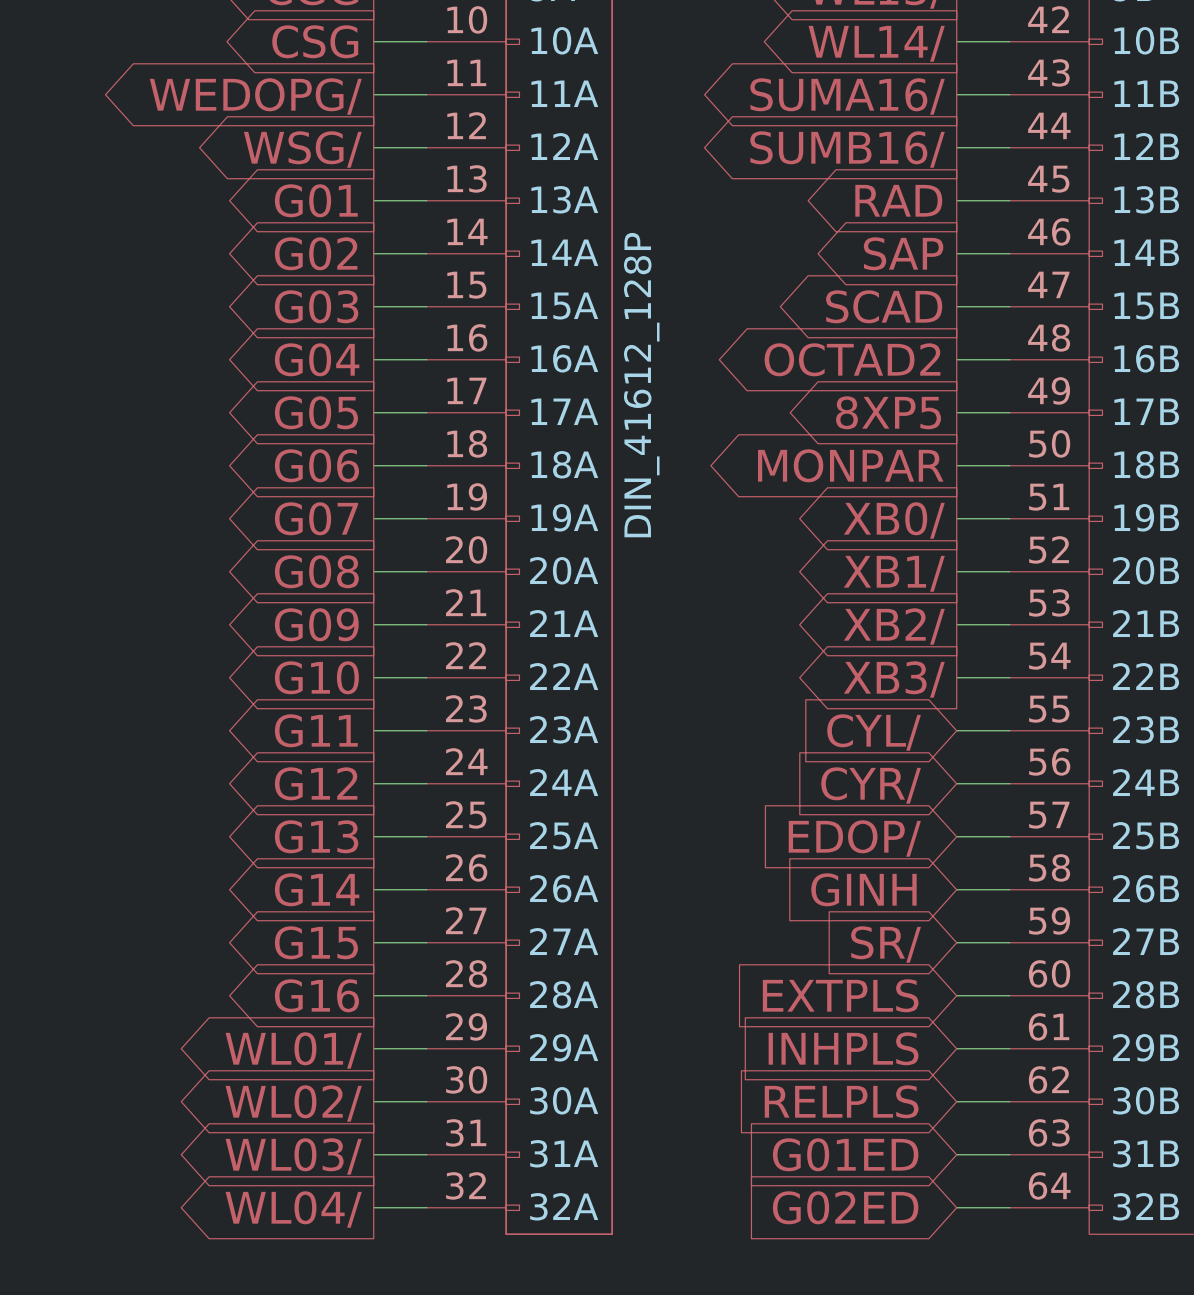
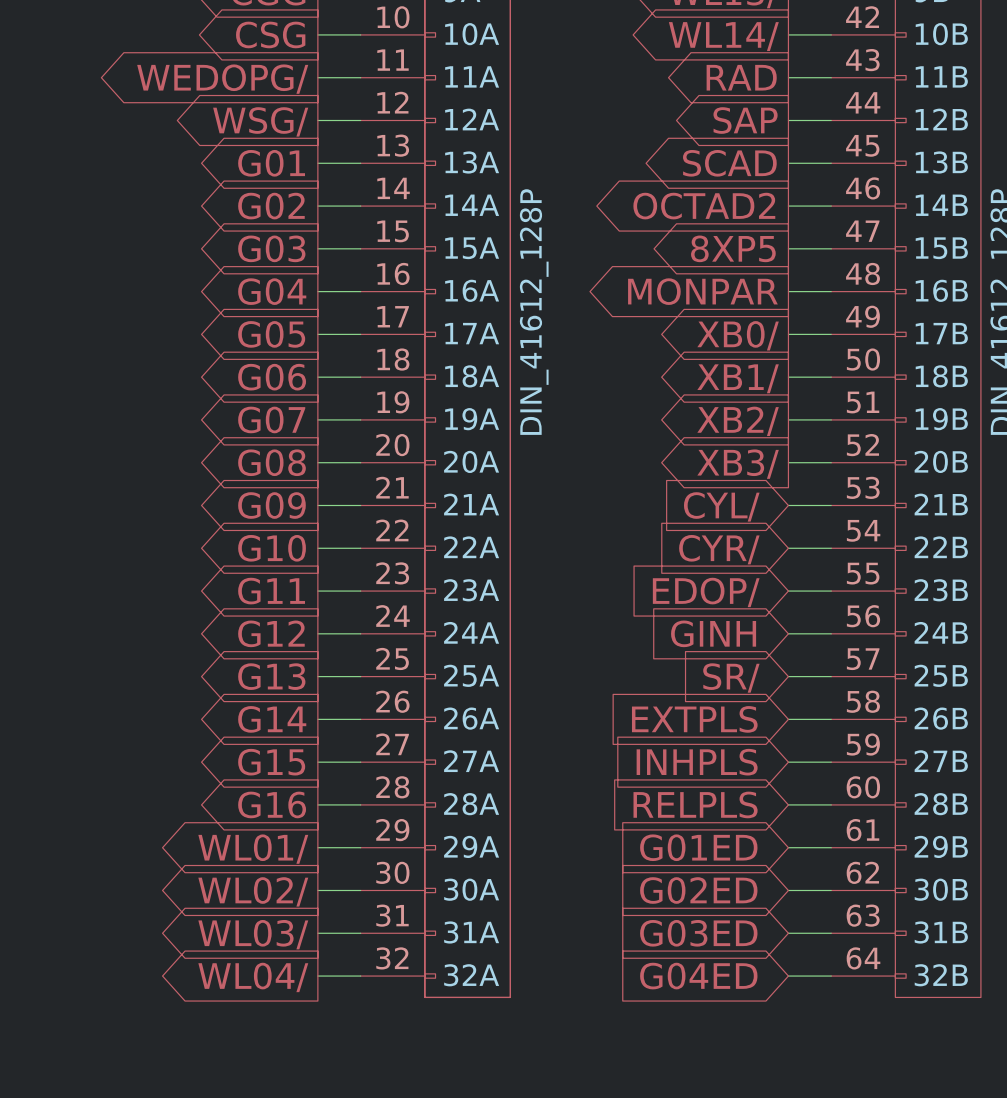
global label: SUMA16/ (847, 96) -> RAD (741, 77)
global label: SUMB16/ (847, 149) -> SAP (745, 120)
global label: RAD (898, 200) -> SCAD (729, 163)
global label: SAP (903, 253) -> OCTAD2 (704, 206)
global label: SCAD (884, 306) -> 8XP5 (733, 248)
global label: OCTAD2 (852, 359) -> MONPAR (702, 291)
global label: 8XP5 (888, 412) -> XB0/ (738, 335)
global label: MONPAR (850, 465) -> XB1/ (738, 378)
global label: XB0/ (894, 520) -> XB2/ (738, 421)
global label: XB1/ (894, 573) -> XB3/ (738, 464)
global label shape: output (894, 626) -> input (721, 506)
global label: XB2/ (894, 626) -> CYL/ (721, 506)
global label shape: output (894, 679) -> input (719, 549)
global label: XB3/ (894, 679) -> CYR/ (719, 549)
global label: CYL/ (874, 732) -> EDOP/ (706, 592)
global label: CYR/ (871, 785) -> GINH (713, 633)
global label: EDOP/ (854, 838) -> SR/ (731, 678)
global label: GINH (863, 889) -> EXTPLS (694, 719)
global label: SR/ (886, 944) -> INHPLS (697, 762)
global label: EXTPLS (840, 995) -> RELPLS (695, 804)
global label: INHPLS (843, 1048) -> G01ED (698, 847)
global label: RELPLS (841, 1101) -> G02ED (698, 890)
global label: G01ED (845, 1154) -> G03ED (698, 933)
global label: G02ED (845, 1207) -> G04ED (698, 976)

